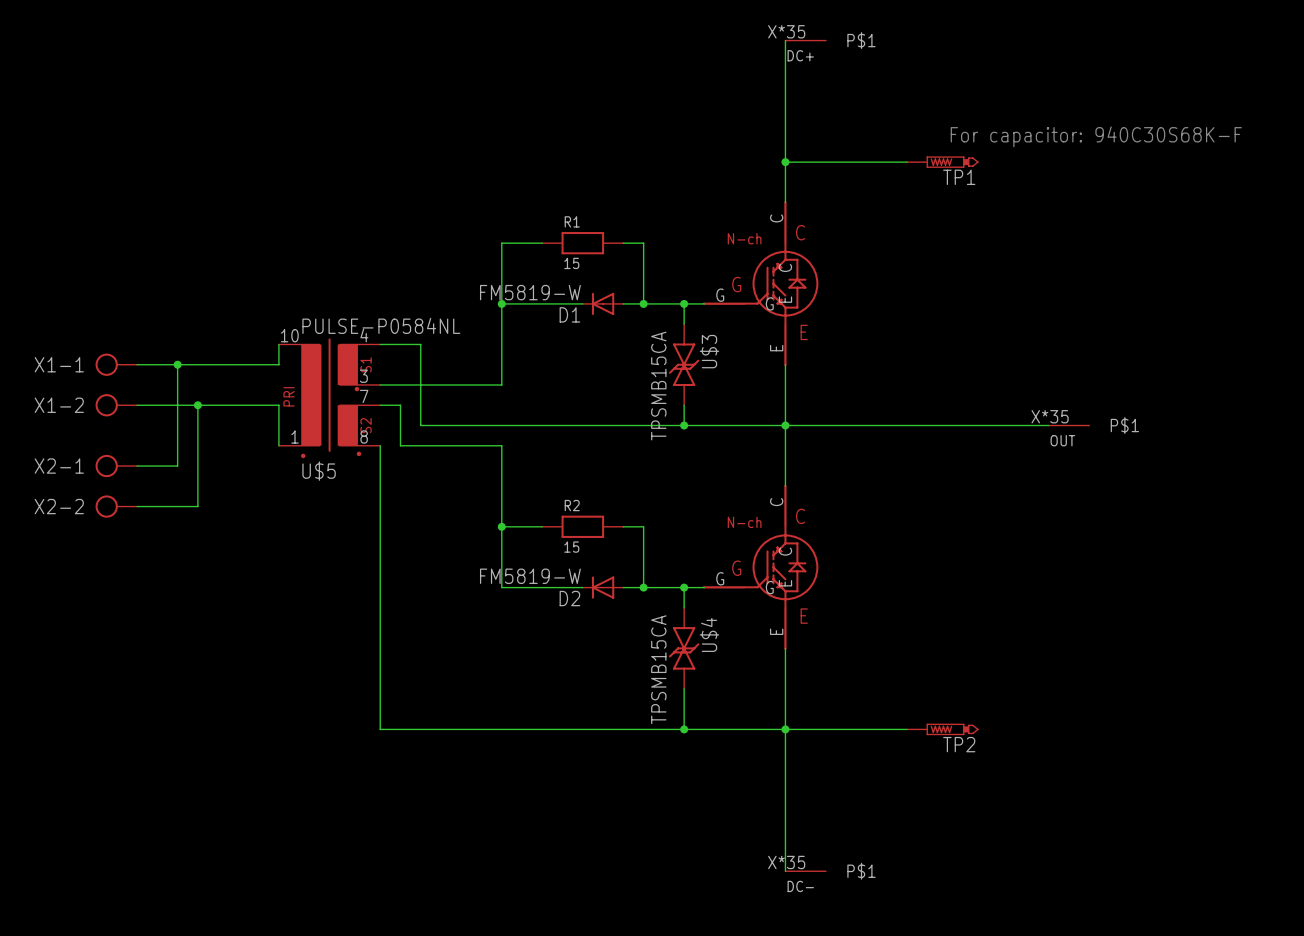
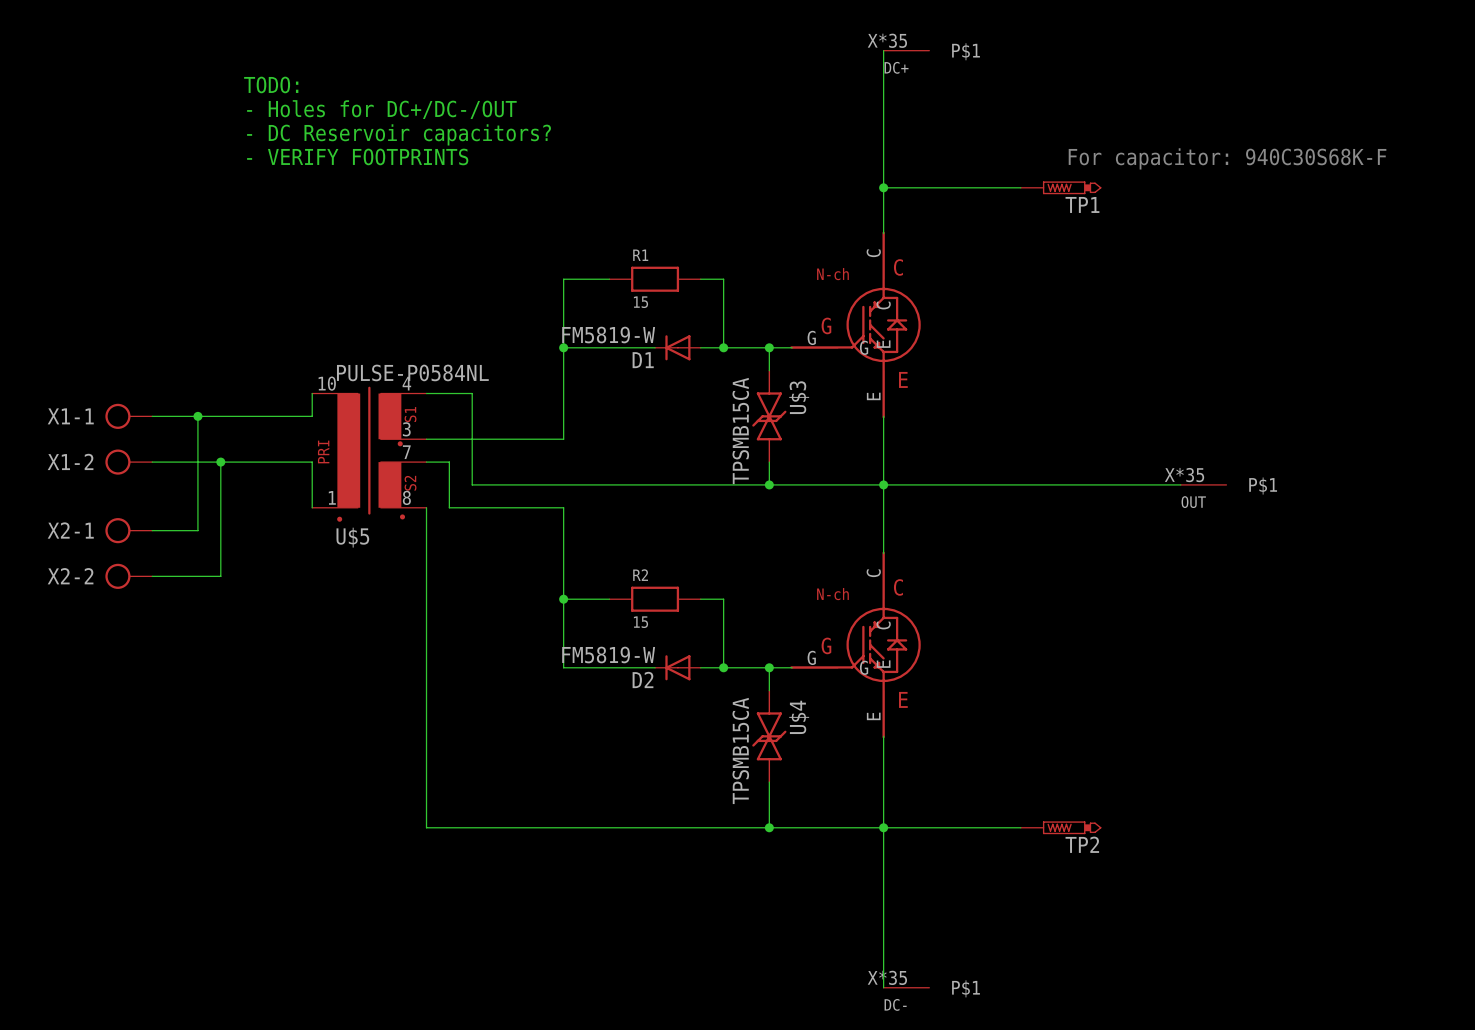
text: none -> TODO: (271, 84)
text: none -> - Holes for DC+/DC-/OUT (381, 109)
text: none -> - DC Reservoir capacitors? (399, 134)
text: none -> - VERIFY FOOTPRINTS (357, 156)

